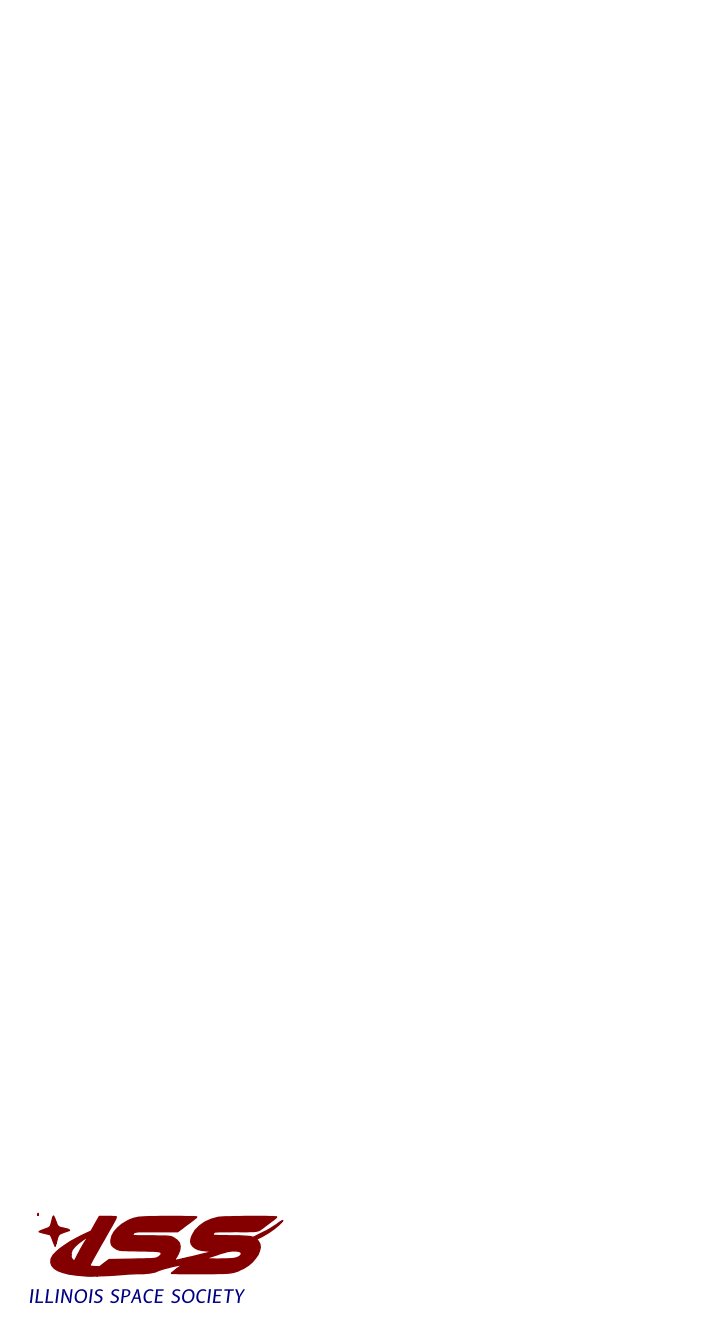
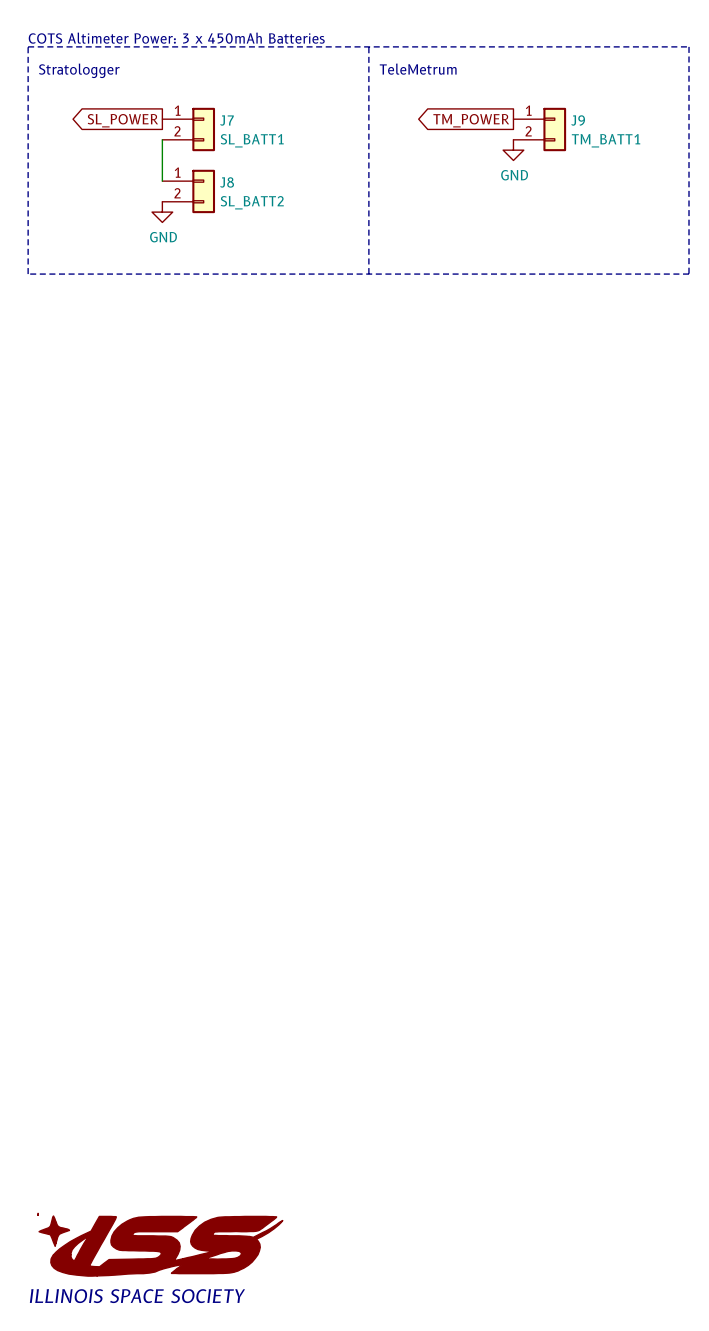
text: none -> COTS Altimeter Power: 3 x 450mAh Batteries (176, 38)
line: none -> (28, 46) (689, 46) (689, 274) (28, 274) (28, 46)
line: none -> (368, 46) (368, 274)
text: none -> TeleMetrum (418, 69)
text: none -> Stratologger (79, 70)
global label: none -> SL_POWER (122, 120)
global label: none -> TM_POWER (471, 120)
J7: none -> SL_BATT1 (188, 129)
J9: none -> TM_BATT1 (539, 129)
wire: none -> (162, 139) (162, 181)
power symbol: none -> GND (513, 150)
J8: none -> SL_BATT2 (188, 191)
power symbol: none -> GND (162, 212)

